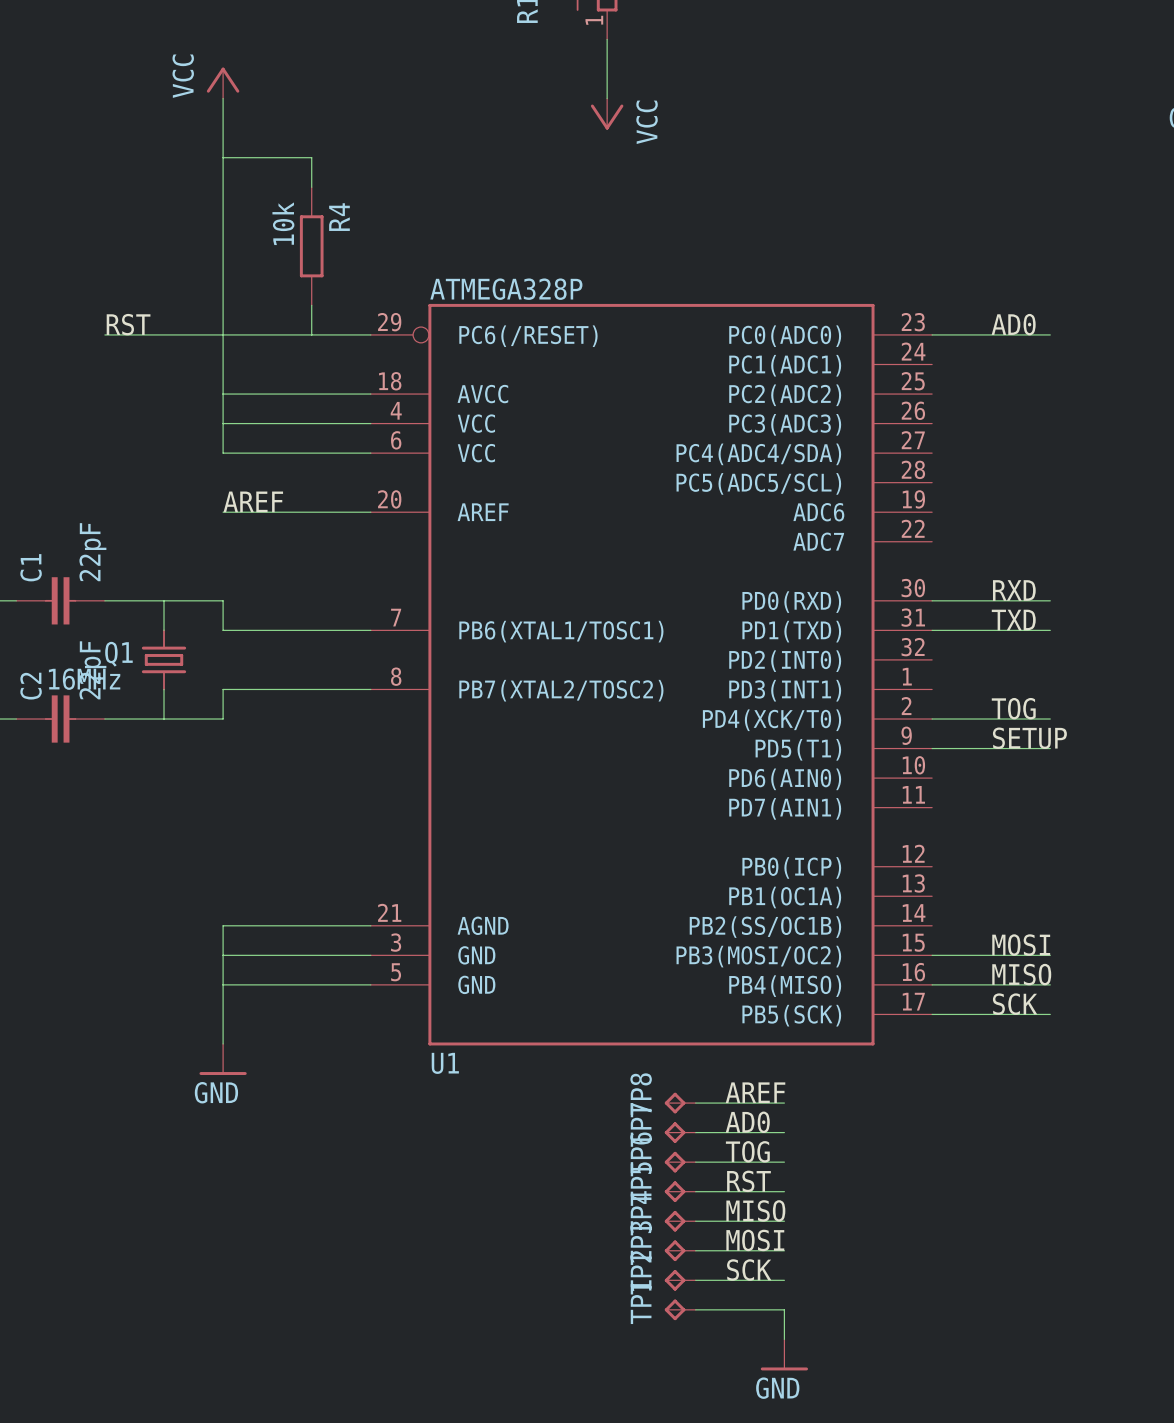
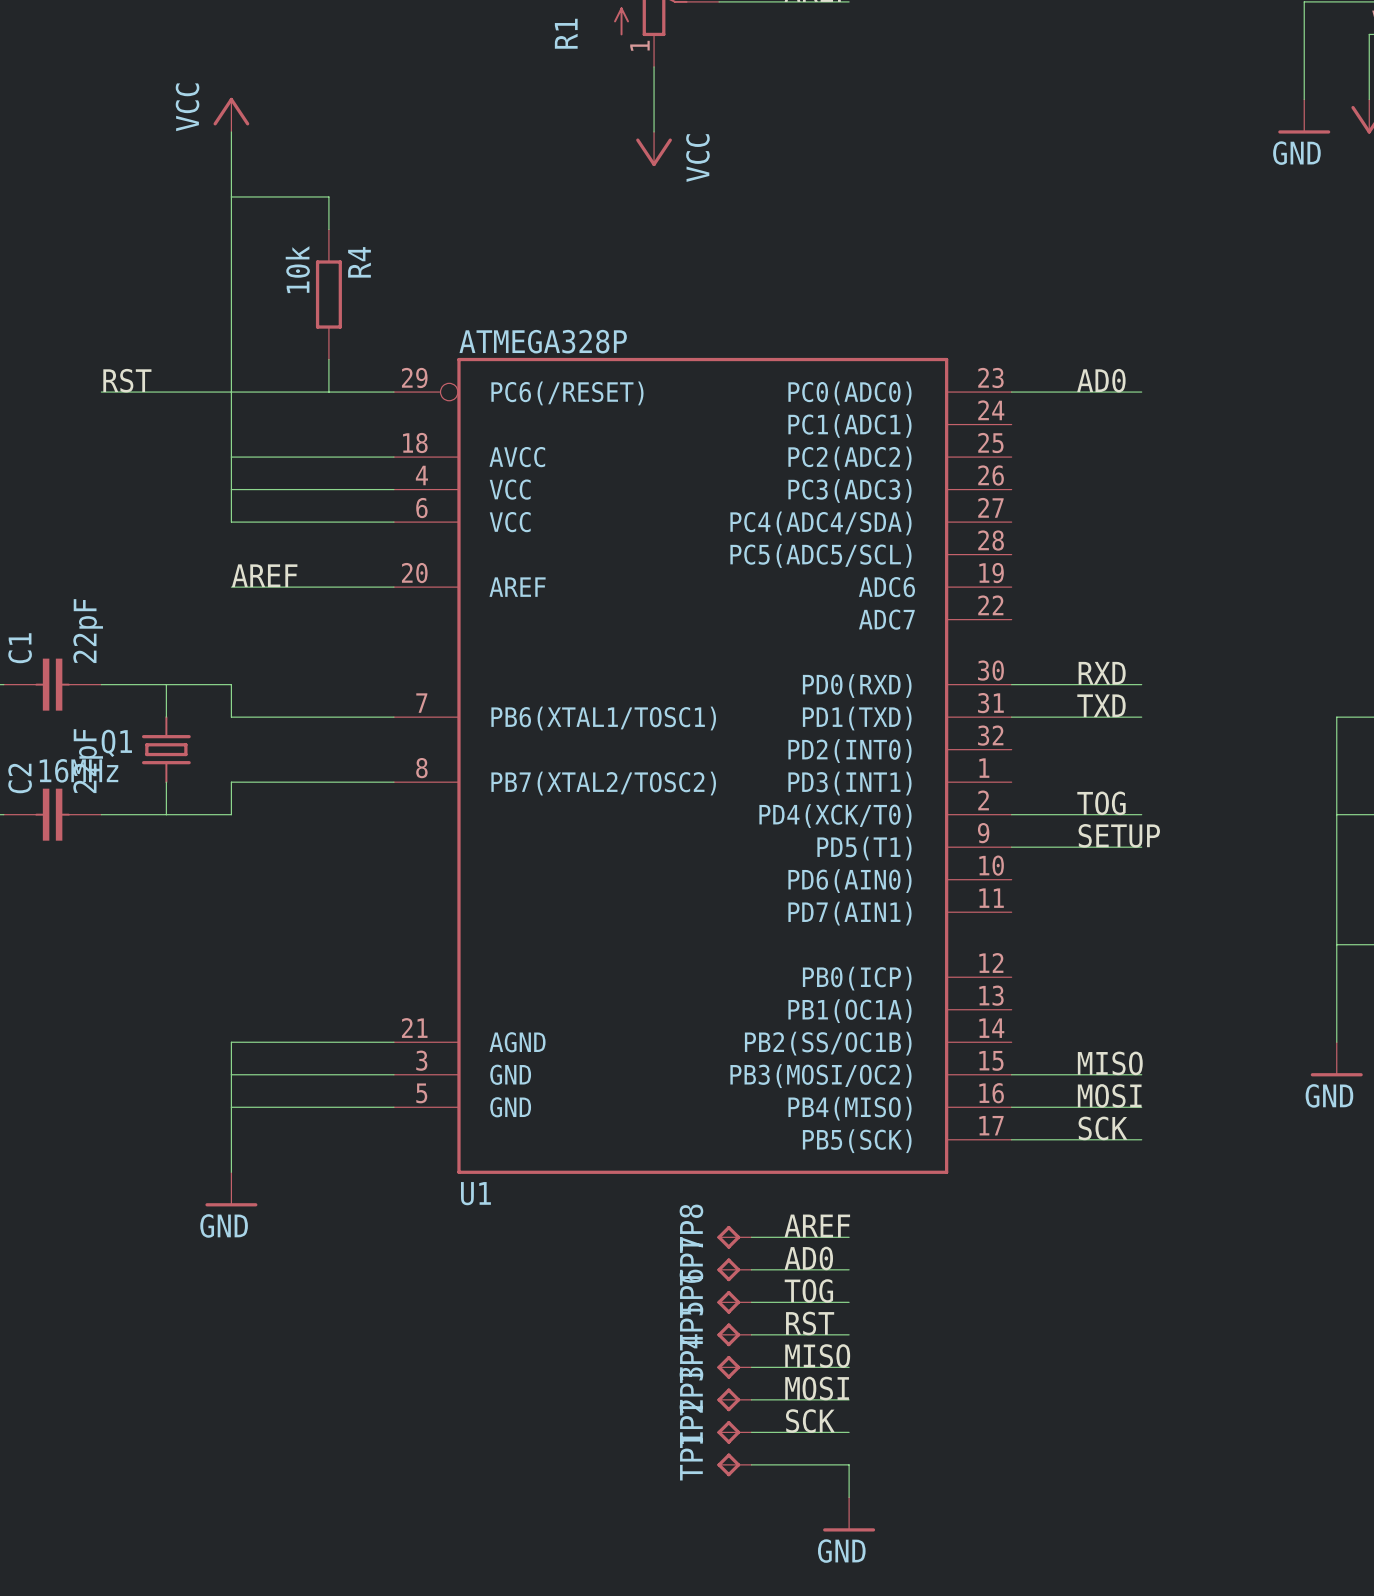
label: MOSI (1021, 945) -> MISO (1110, 1063)
label: MISO (1021, 974) -> MOSI (1109, 1095)

